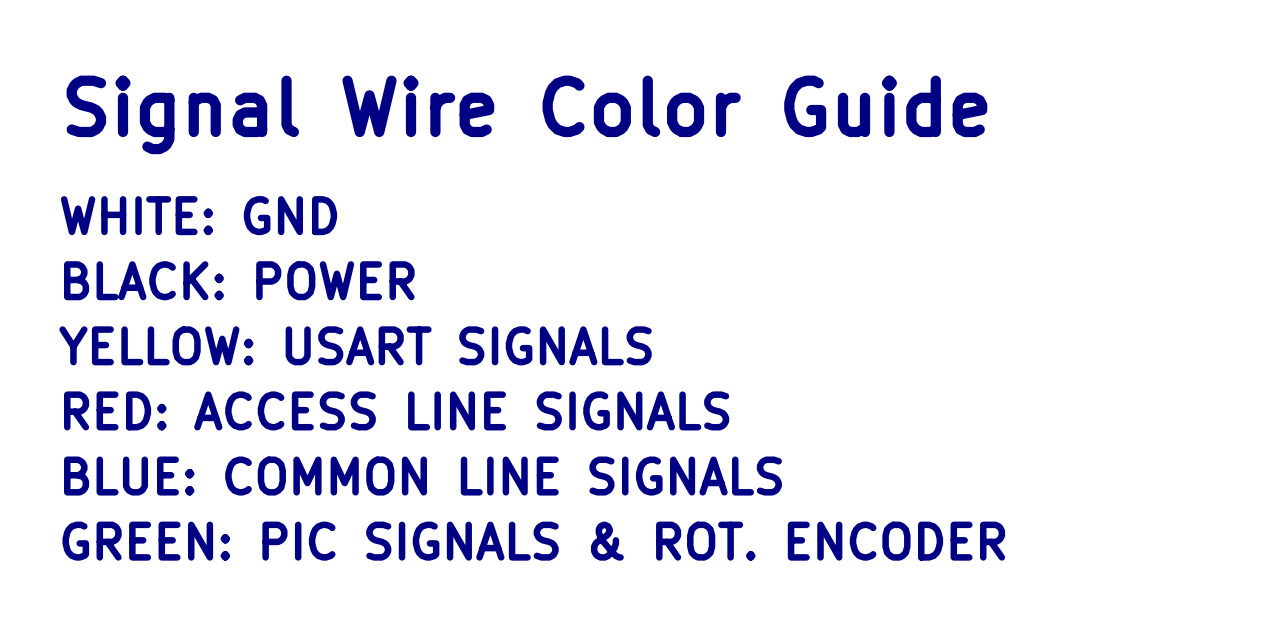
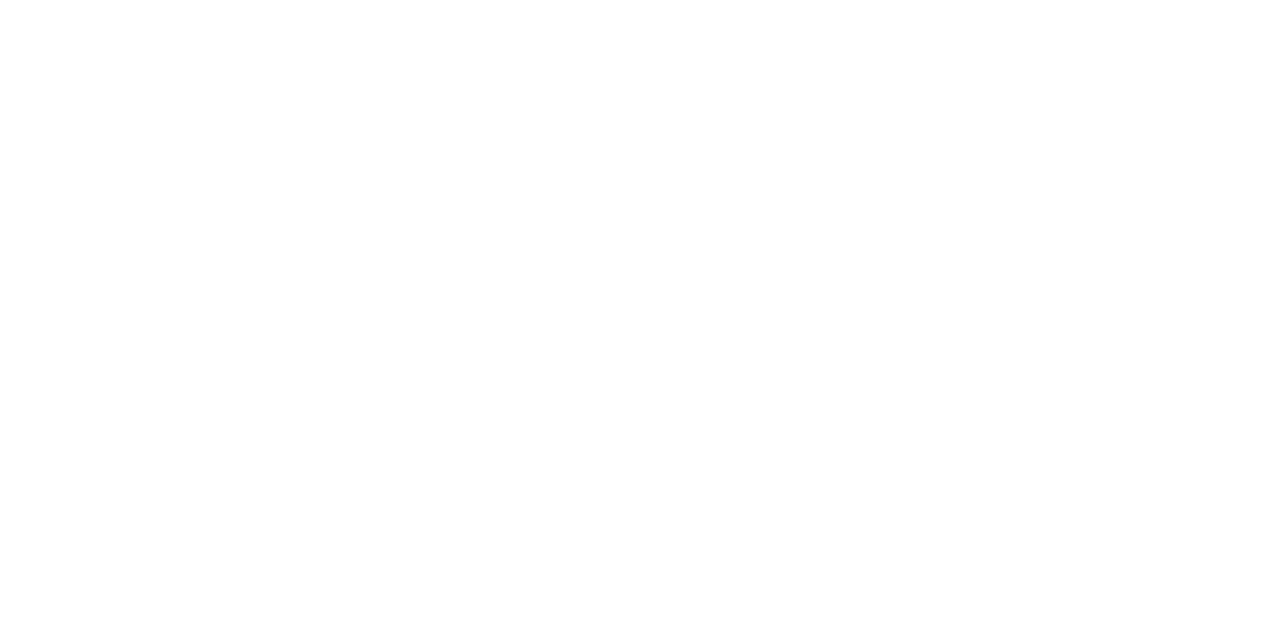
text: Signal Wire Color Guide (526, 114) -> none
text: WHITE: GND (198, 215) -> none
text: BLACK: POWER (239, 280) -> none
text: YELLOW: USART SIGNALS (355, 345) -> none
text: RED: ACCESS LINE SIGNALS (396, 410) -> none
text: BLUE: COMMON LINE SIGNALS (422, 476) -> none
text: GREEN: PIC SIGNALS & ROT. ENCODER (533, 541) -> none

